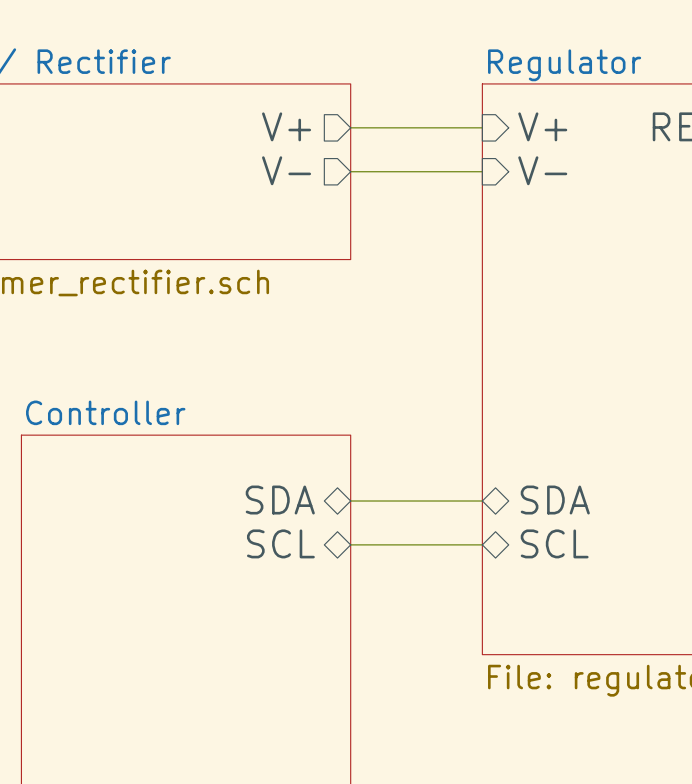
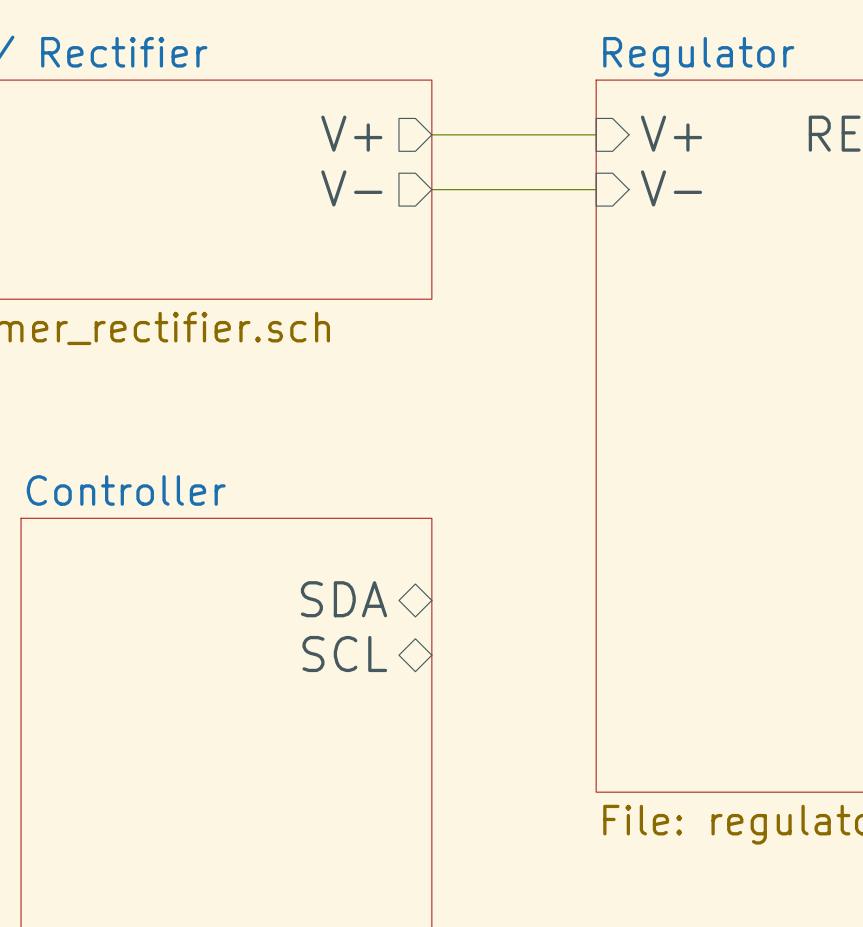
sheet pin: SDA (555, 500) -> none
wire: (350, 501) (482, 501) -> none
sheet pin: SCL (554, 543) -> none
wire: (350, 544) (482, 544) -> none

